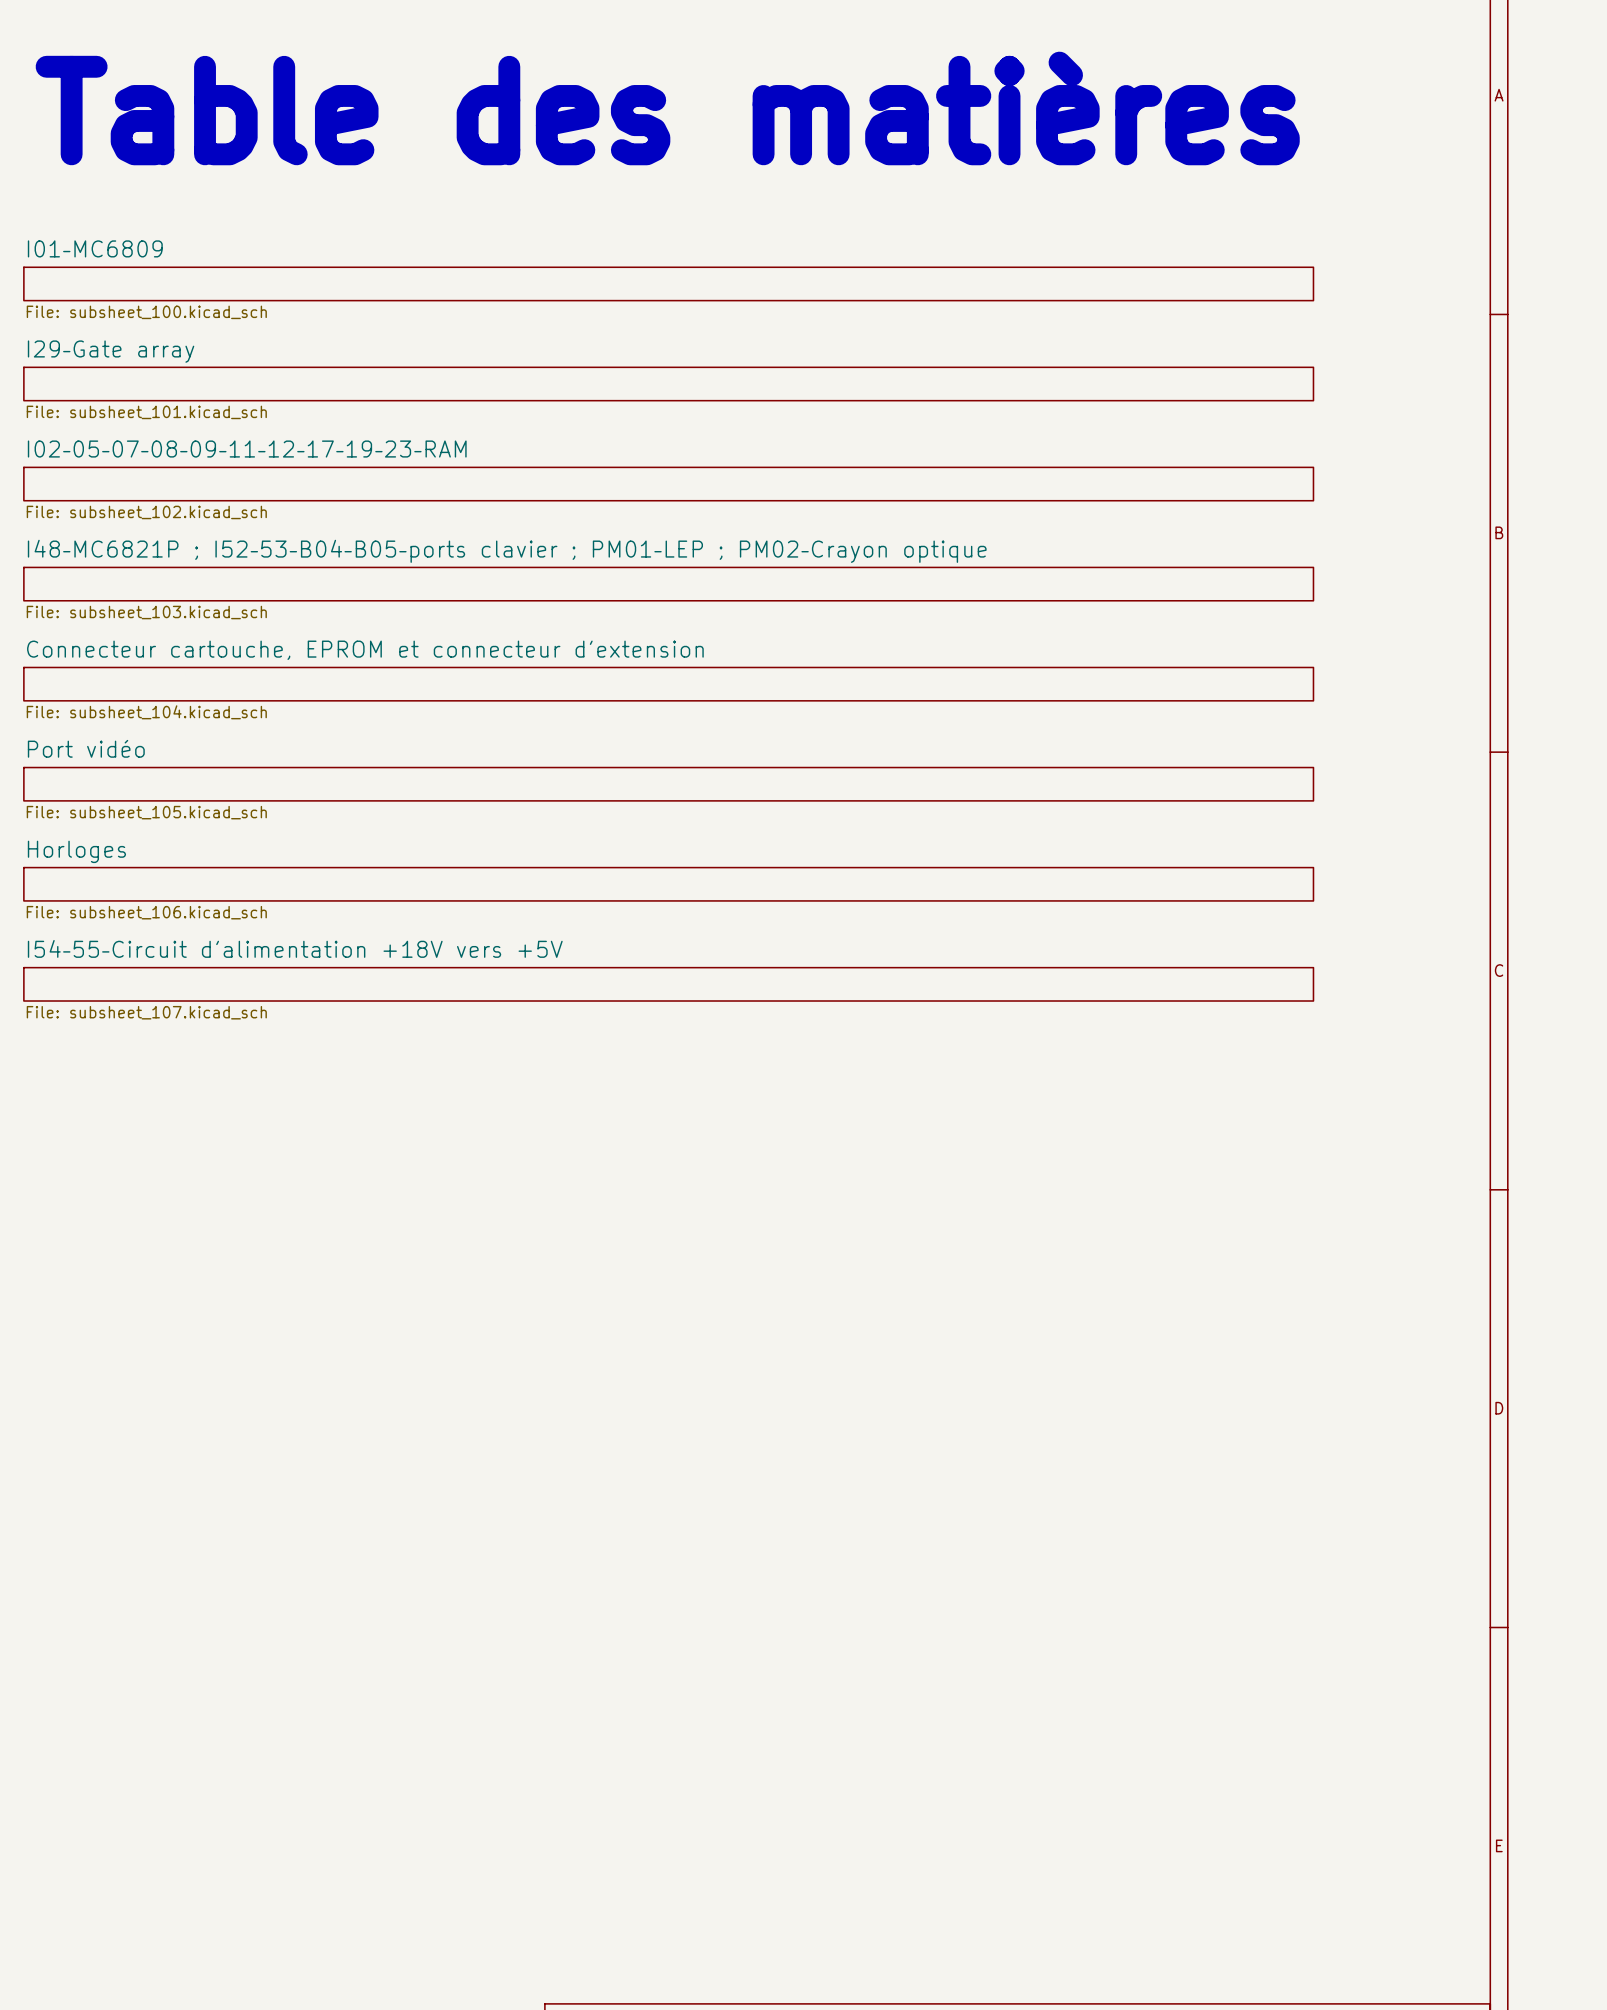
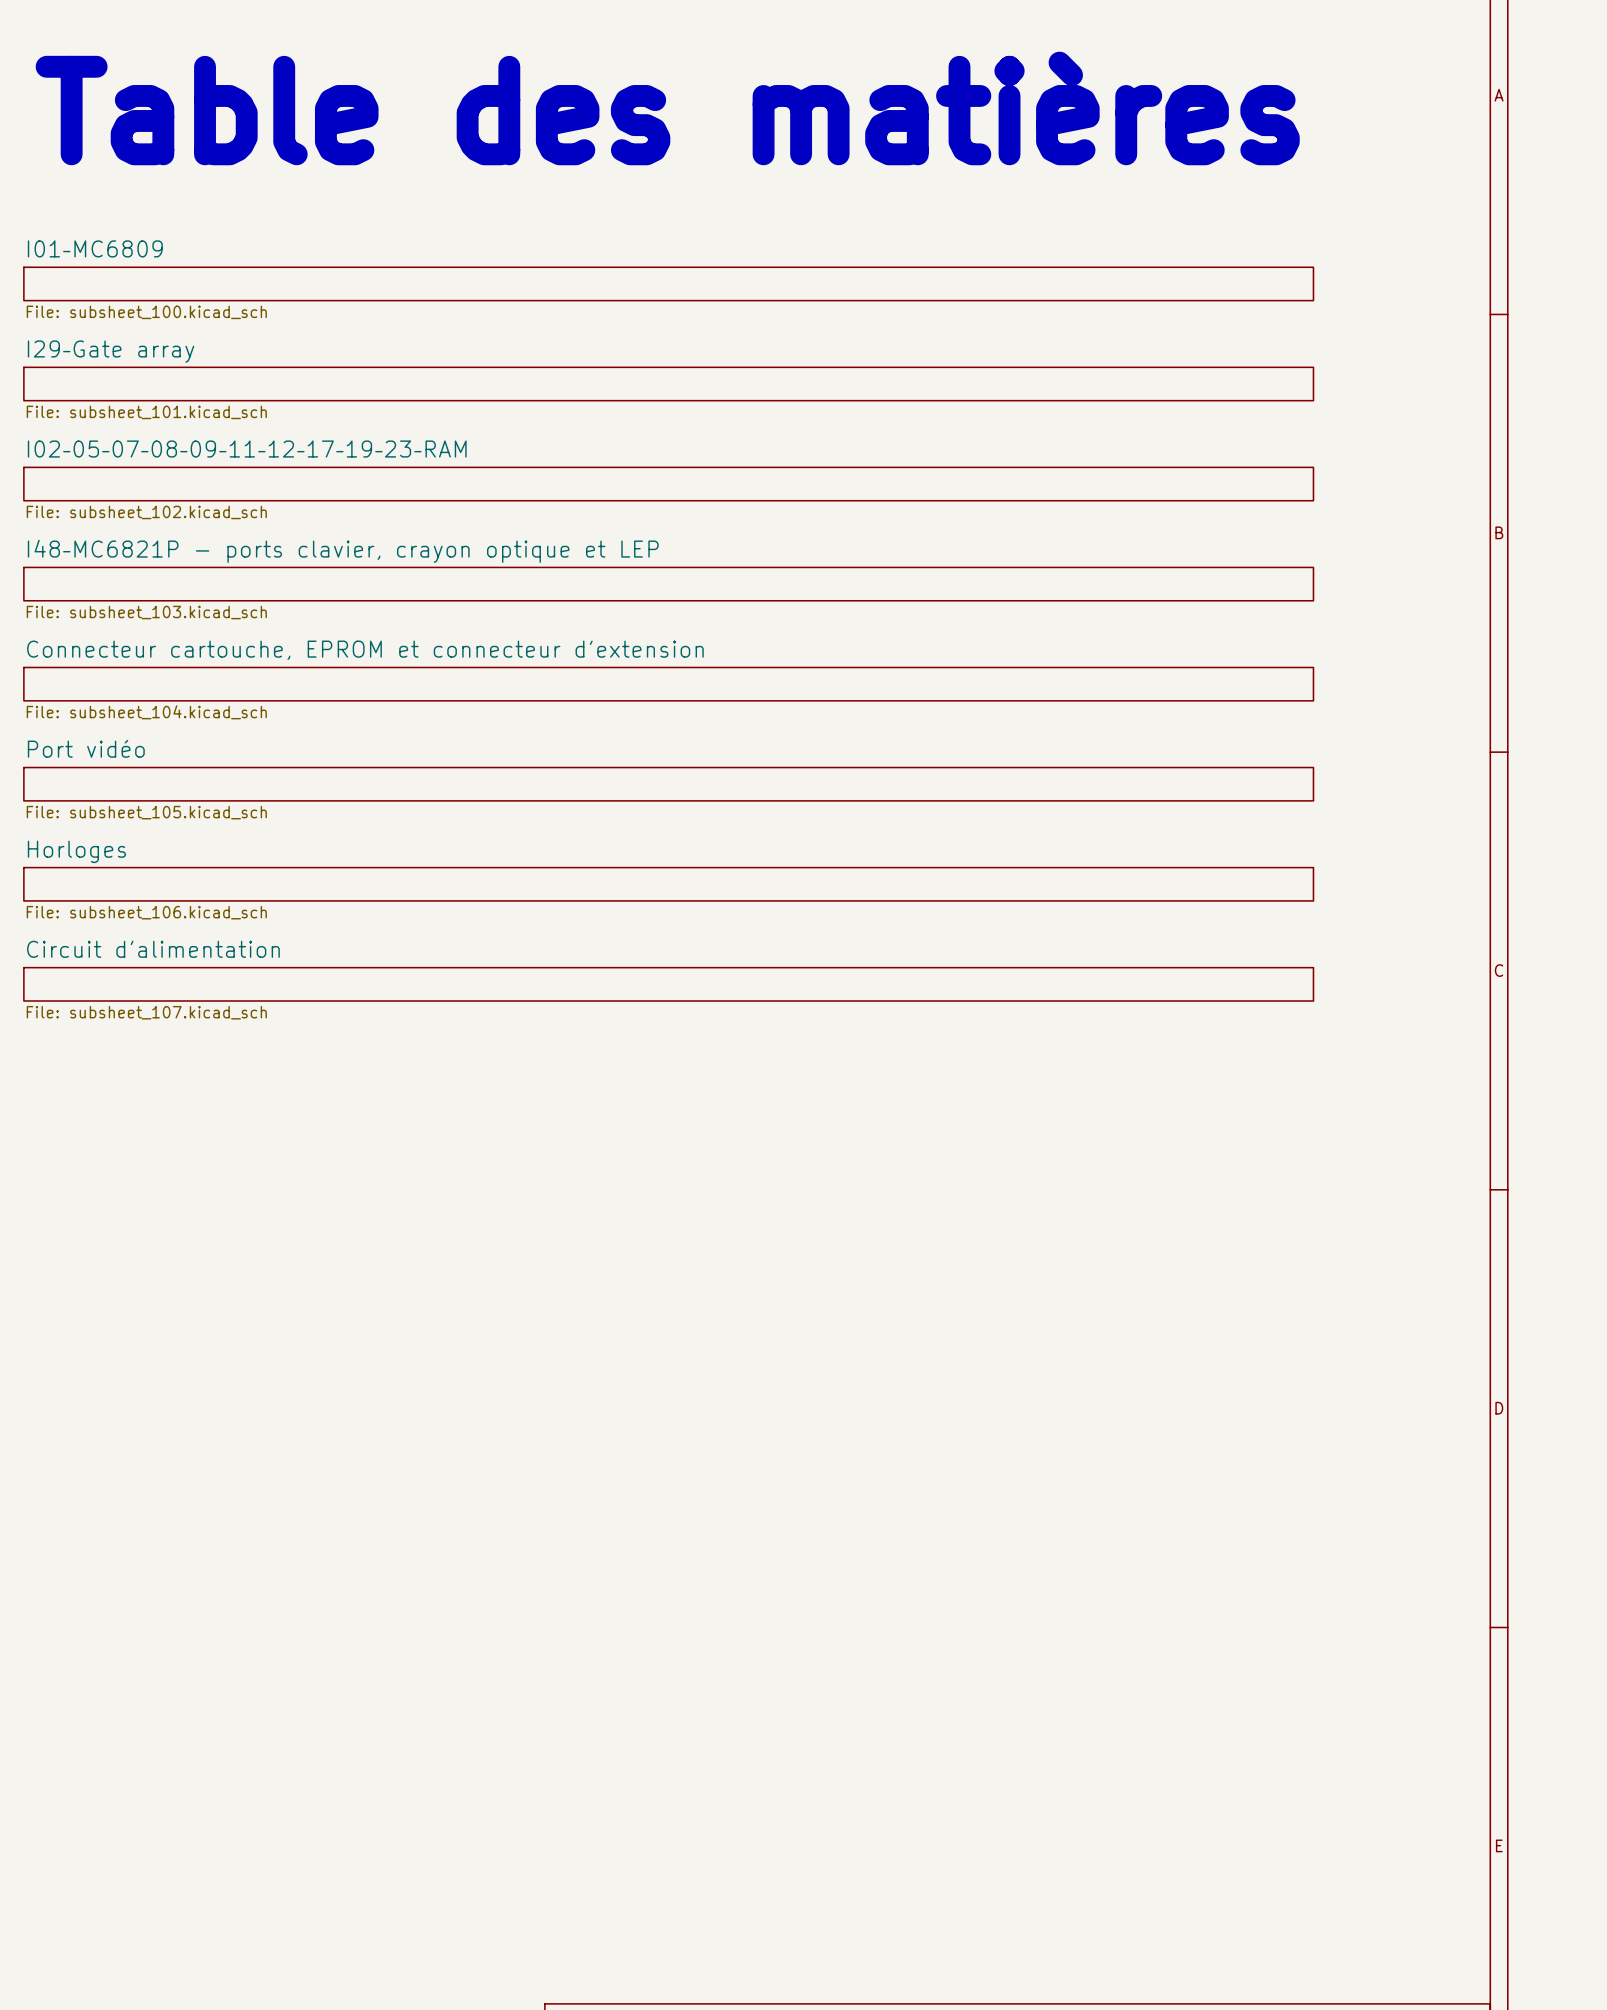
sheet I48–MC6821P ; I52–53–B04–B05–ports clavier ; PM01–LEP ; PM02–Crayon optique name: I48–MC6821P ; I52–53–B04–B05–ports clavier ; PM01–LEP ; PM02–Crayon optique (507, 551) -> I48–MC6821P - ports clavier, crayon optique et LEP (343, 551)
sheet I54–55–Circuit d'alimentation +18V vers +5V name: I54–55–Circuit d'alimentation +18V vers +5V (295, 948) -> Circuit d'alimentation (153, 949)

